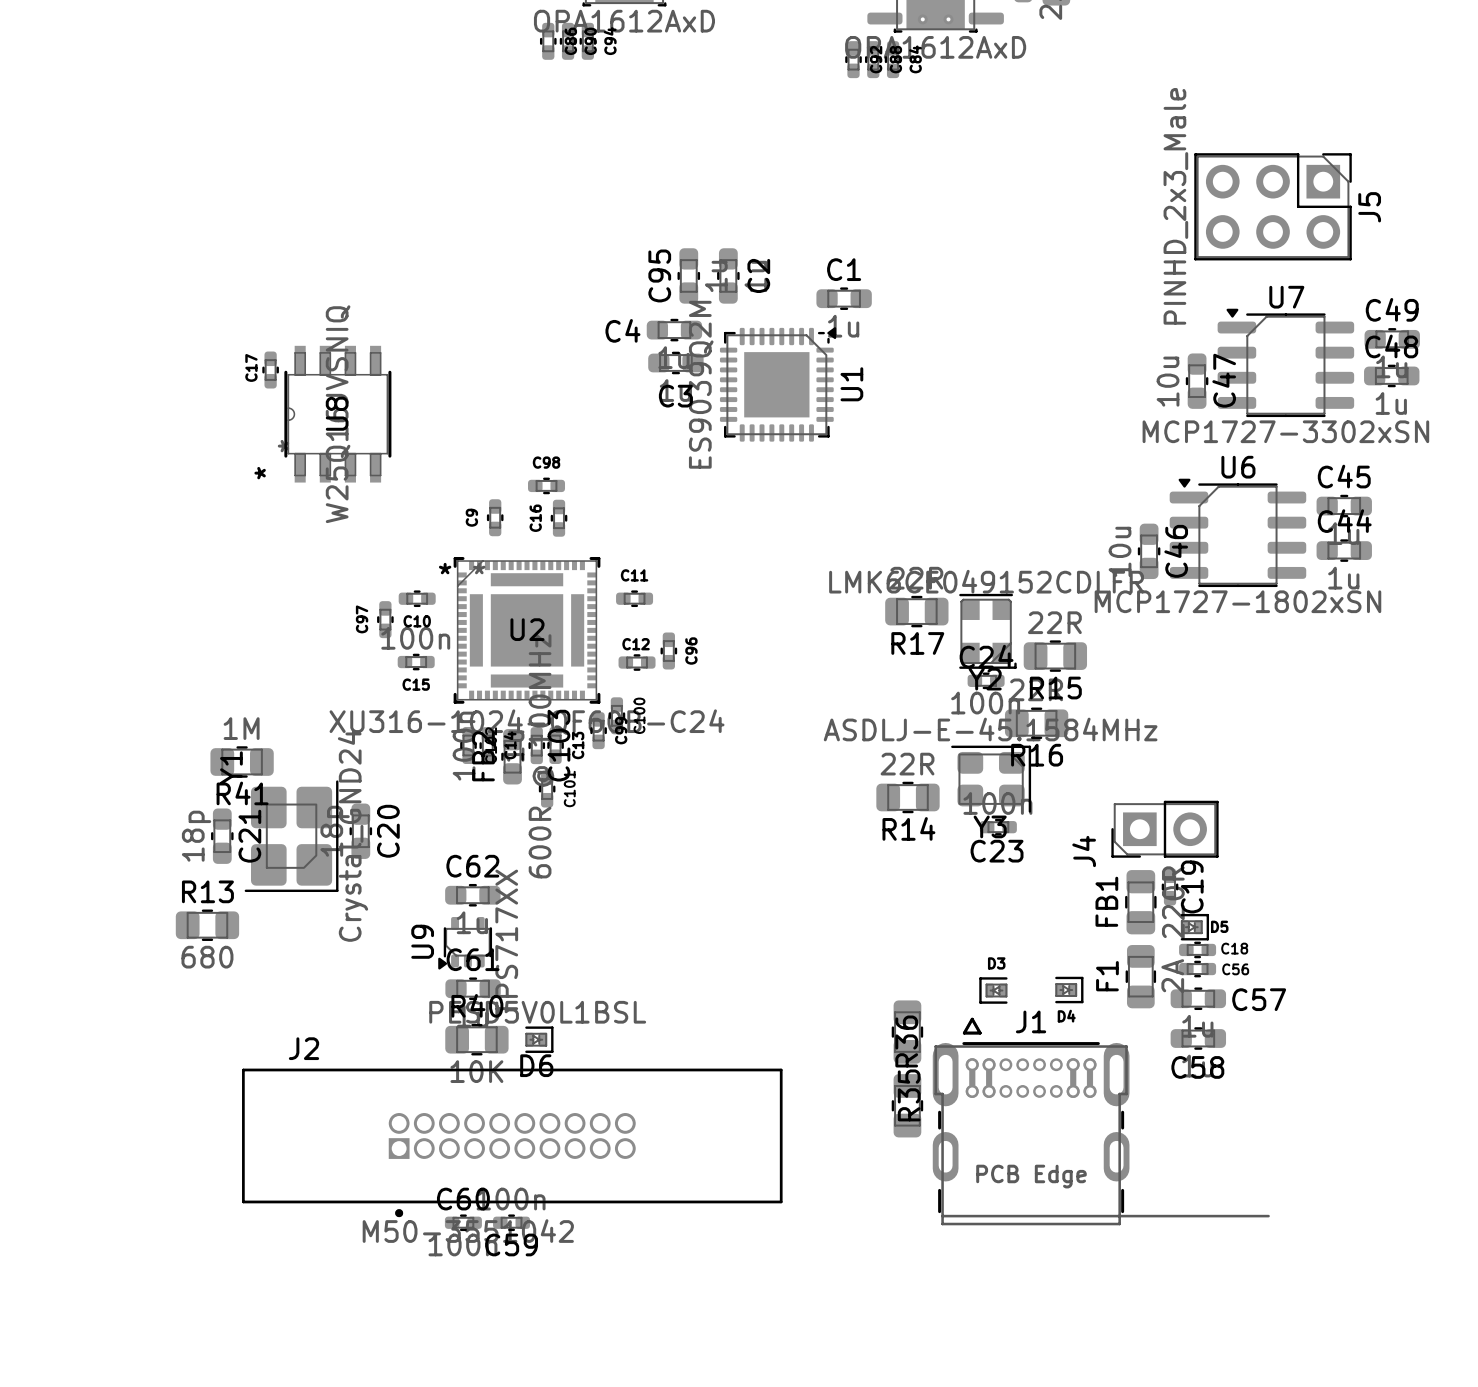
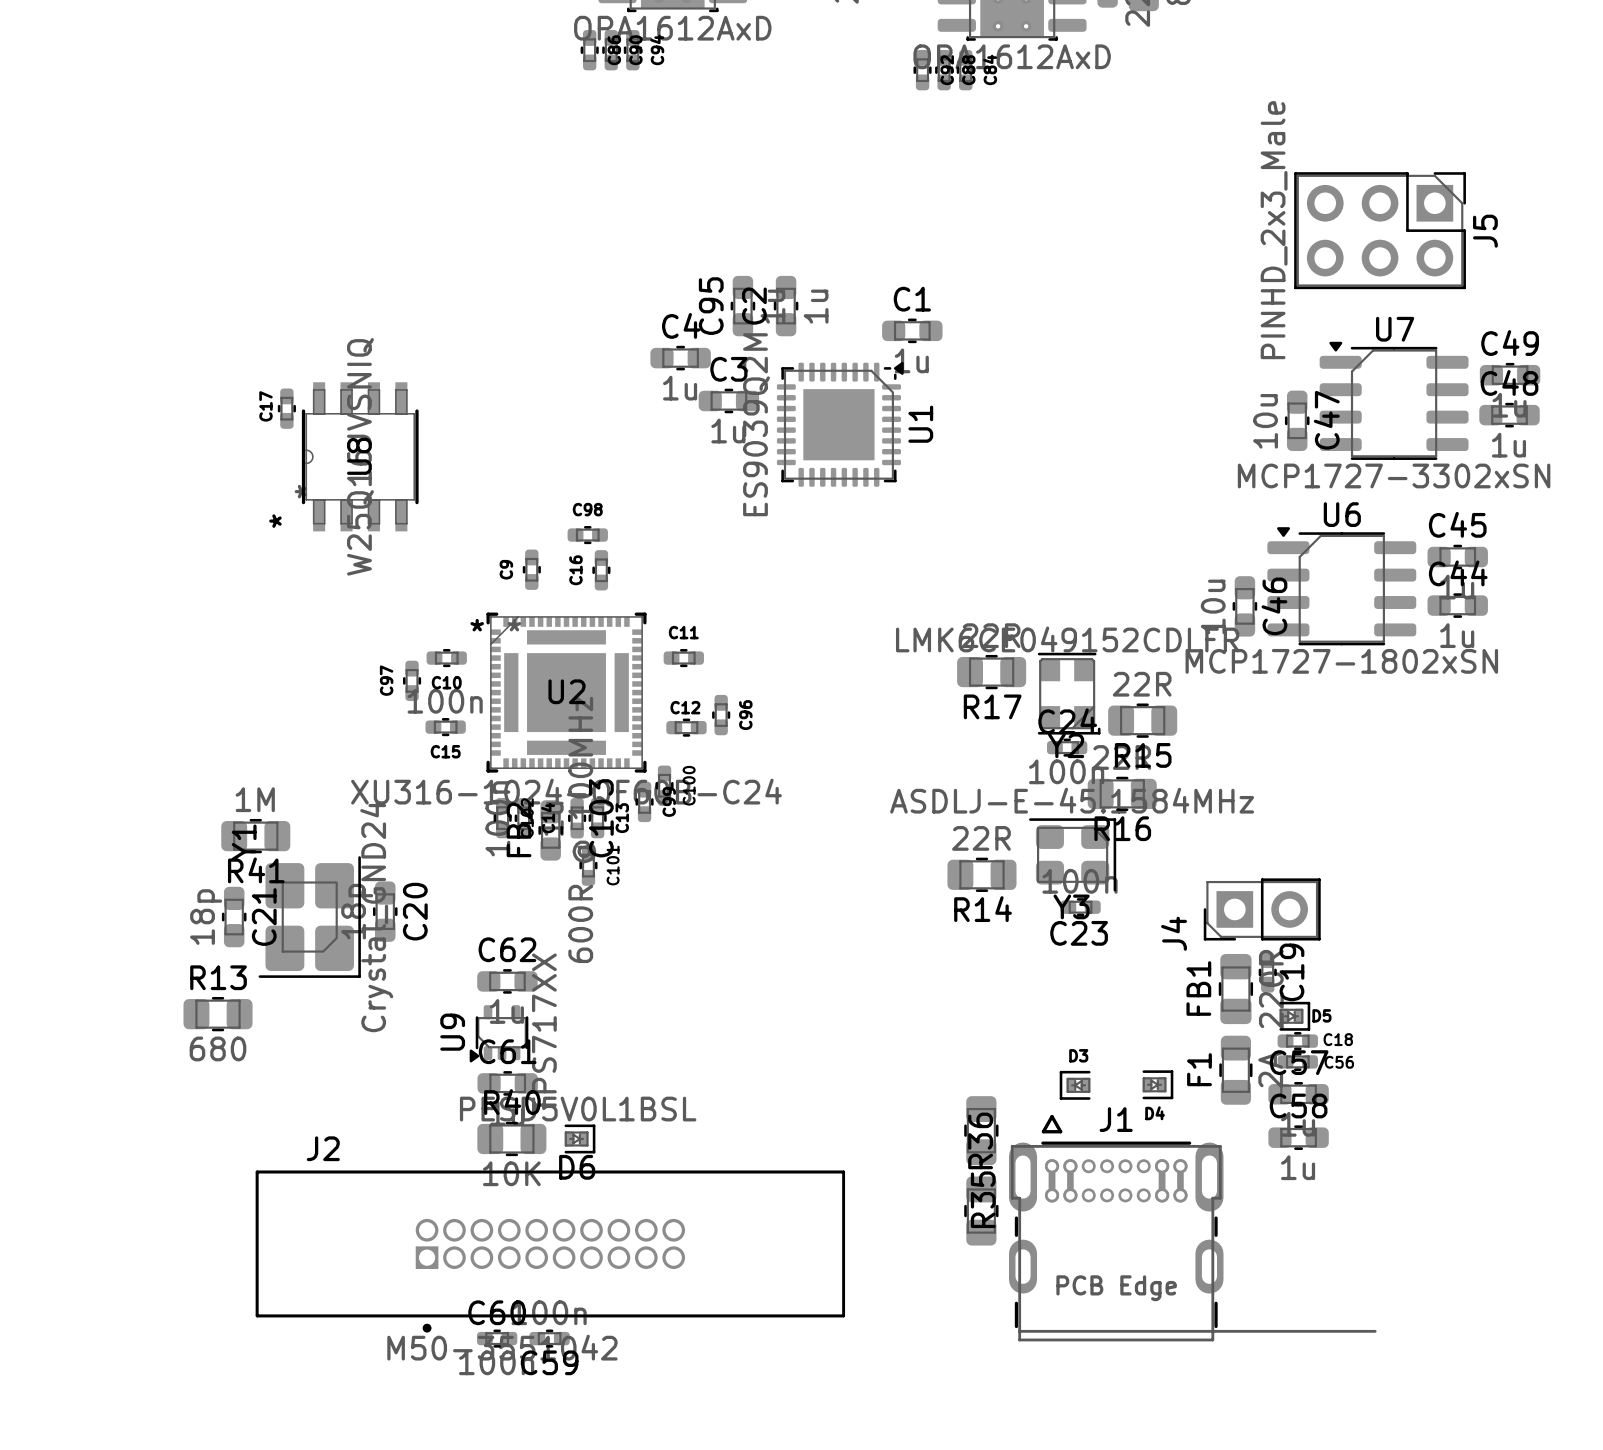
C2 name position: C2 (758, 275) -> C2 (754, 306)
C4 name position: C4 (622, 330) -> C4 (681, 325)
C4 position: (674, 330) -> (680, 358)
C3 name position: C3 (675, 396) -> C3 (728, 369)
C57 name position: C57 (1259, 999) -> C57 (1299, 1062)
C58 name position: C58 (1197, 1067) -> C58 (1298, 1105)

